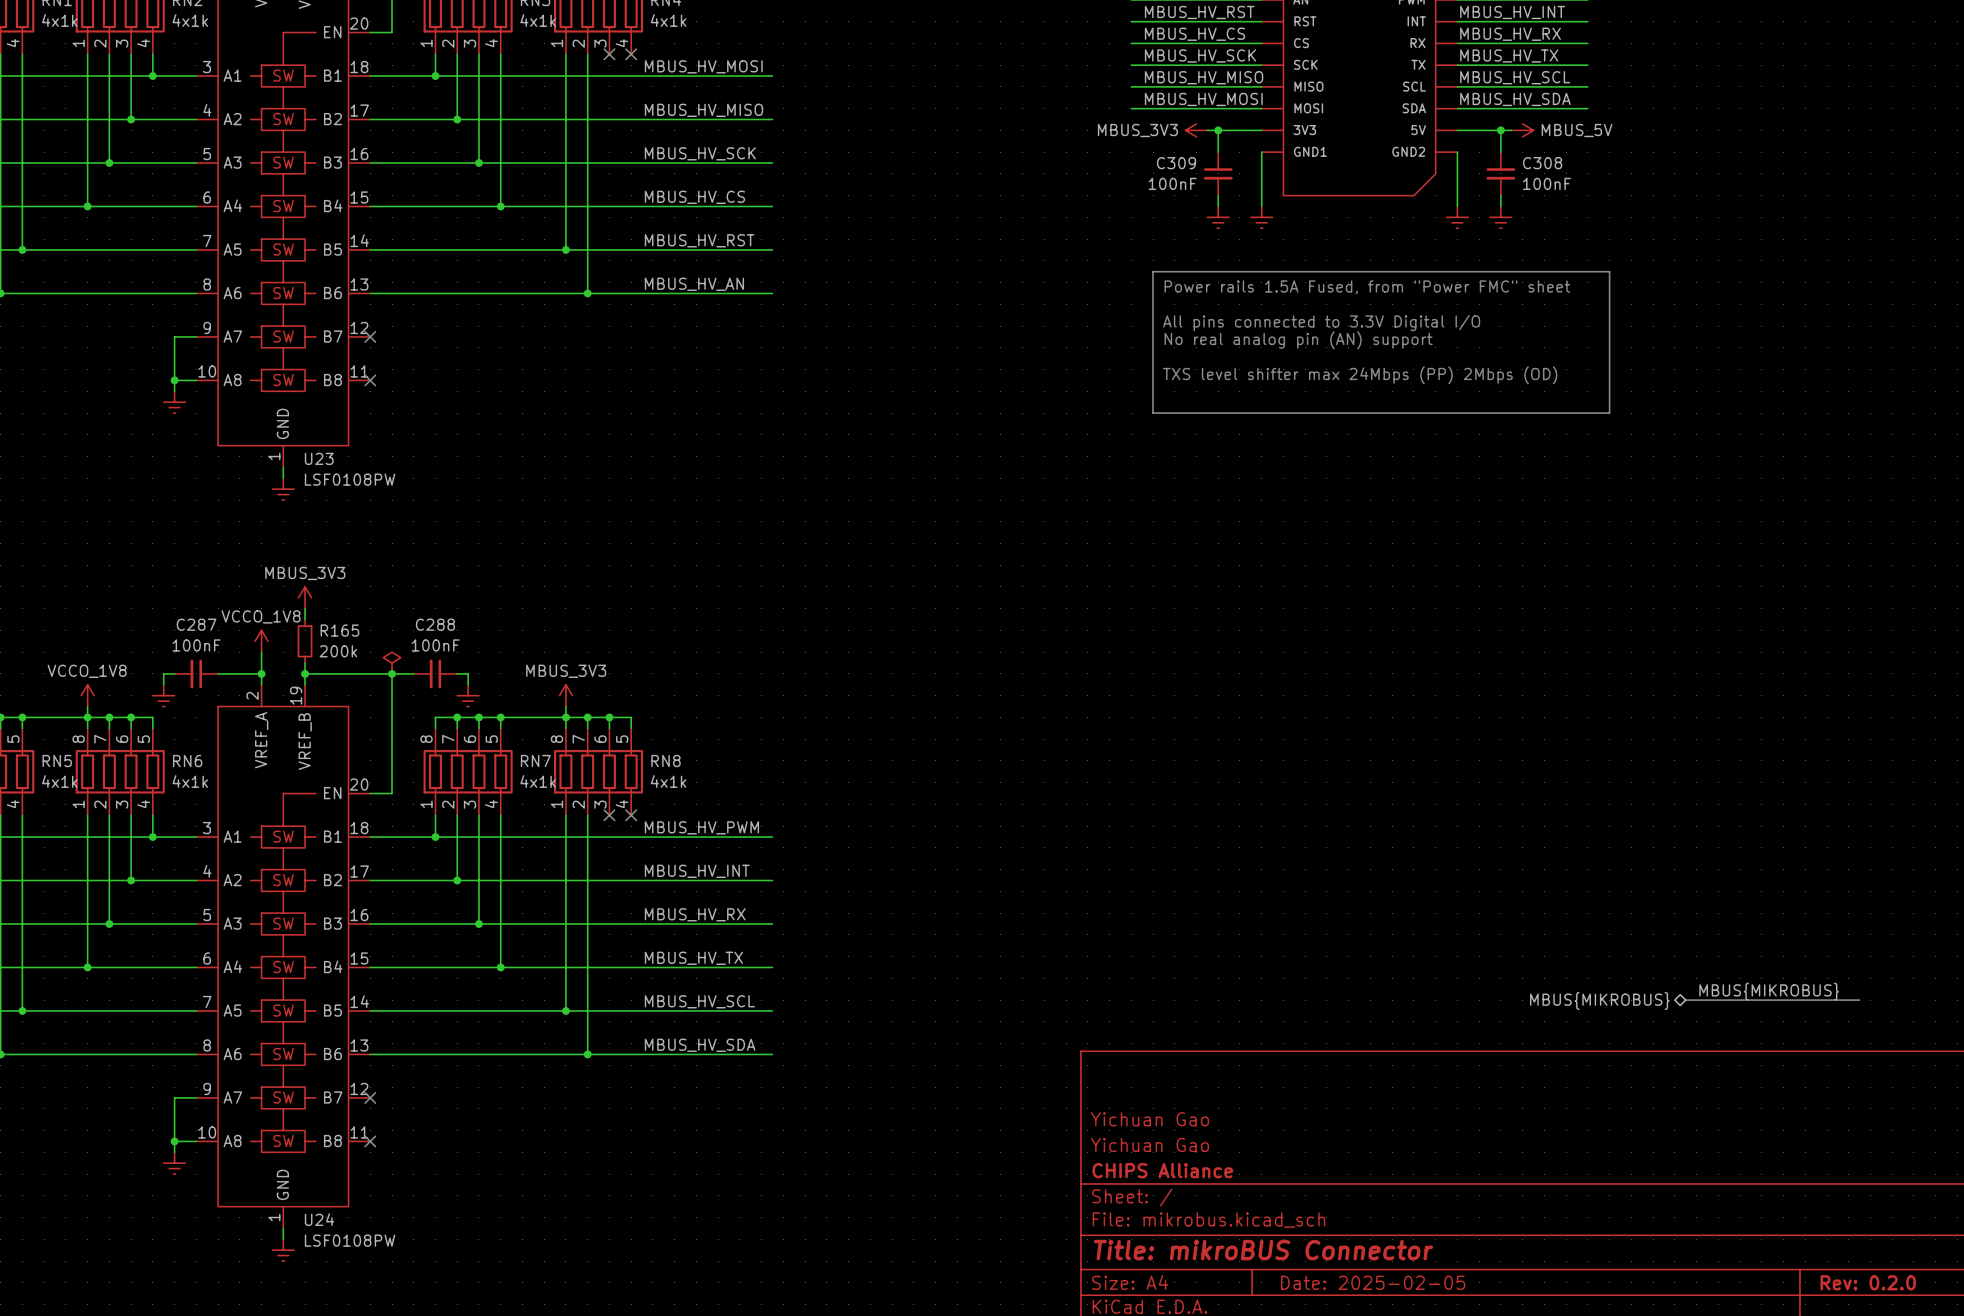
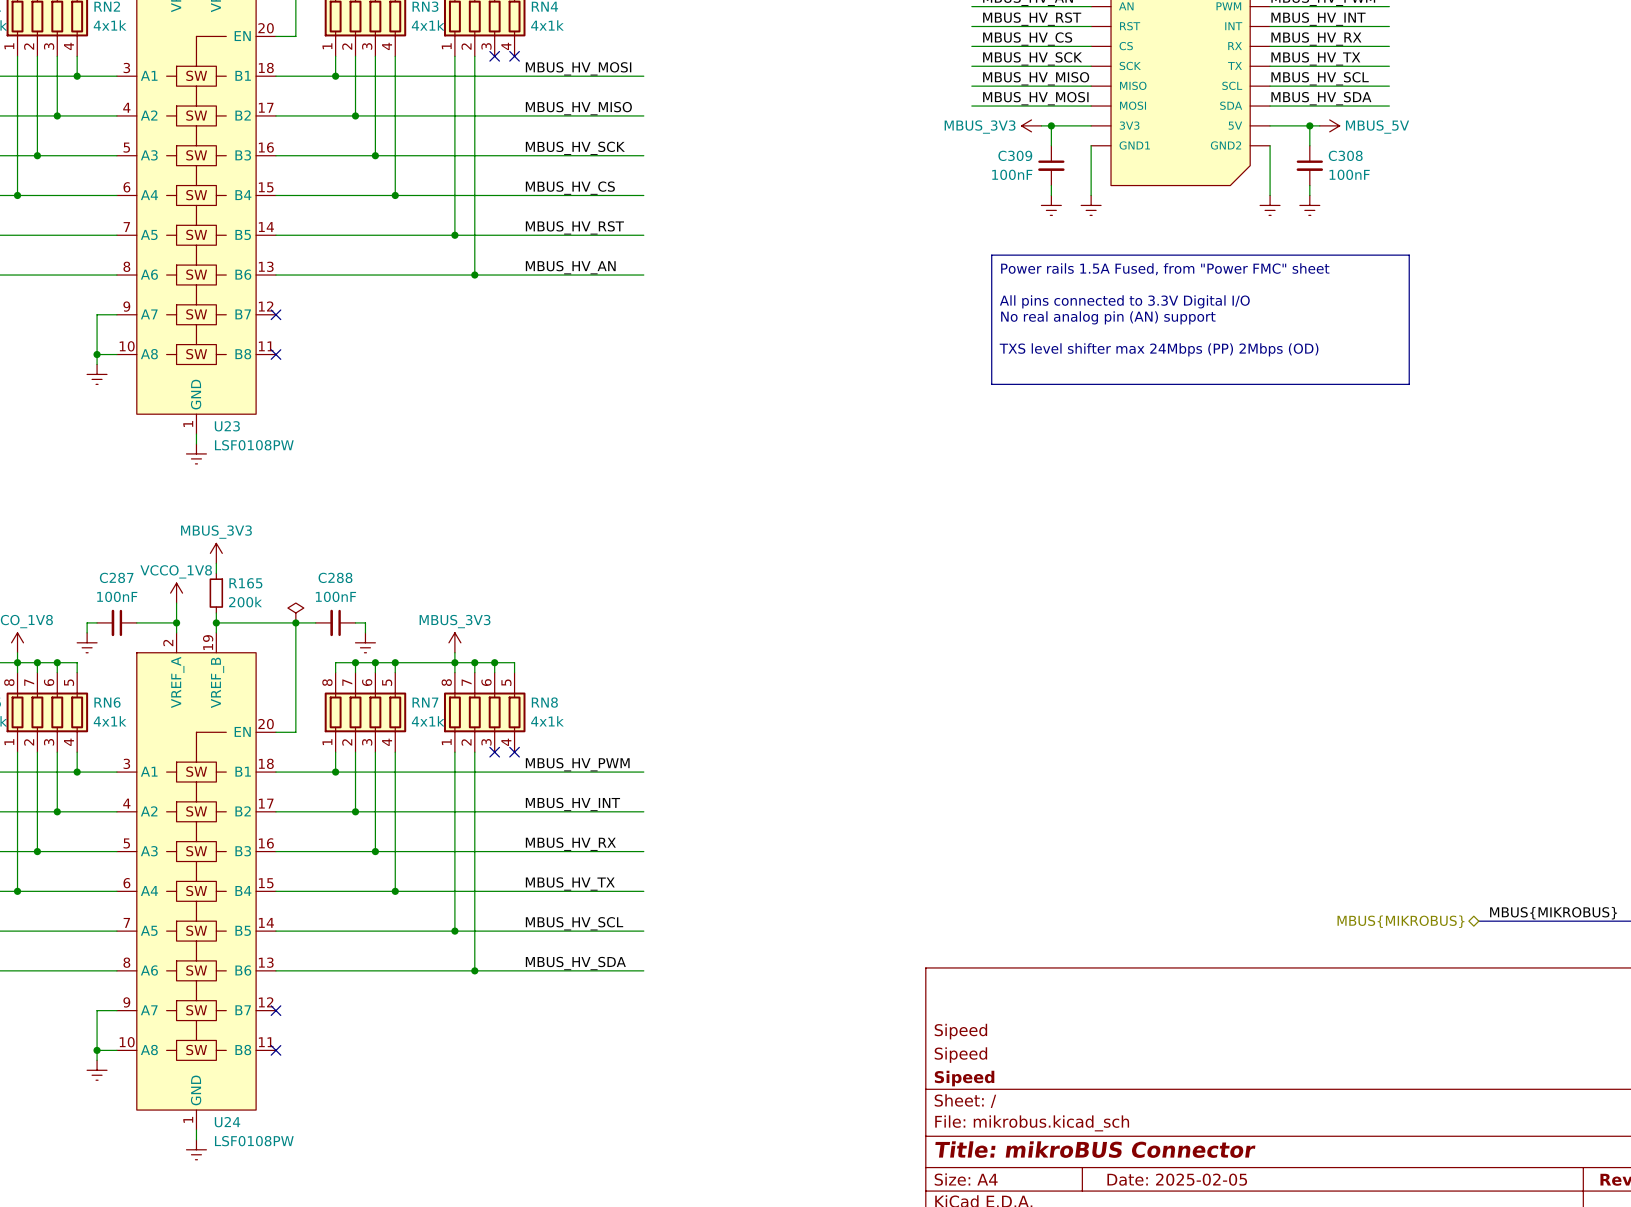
title block: Yichuan Gao (1149, 1119) -> Sipeed (960, 1031)
title block: Yichuan Gao (1149, 1144) -> Sipeed (960, 1055)
title block: CHIPS Alliance (1162, 1170) -> Sipeed (964, 1078)

